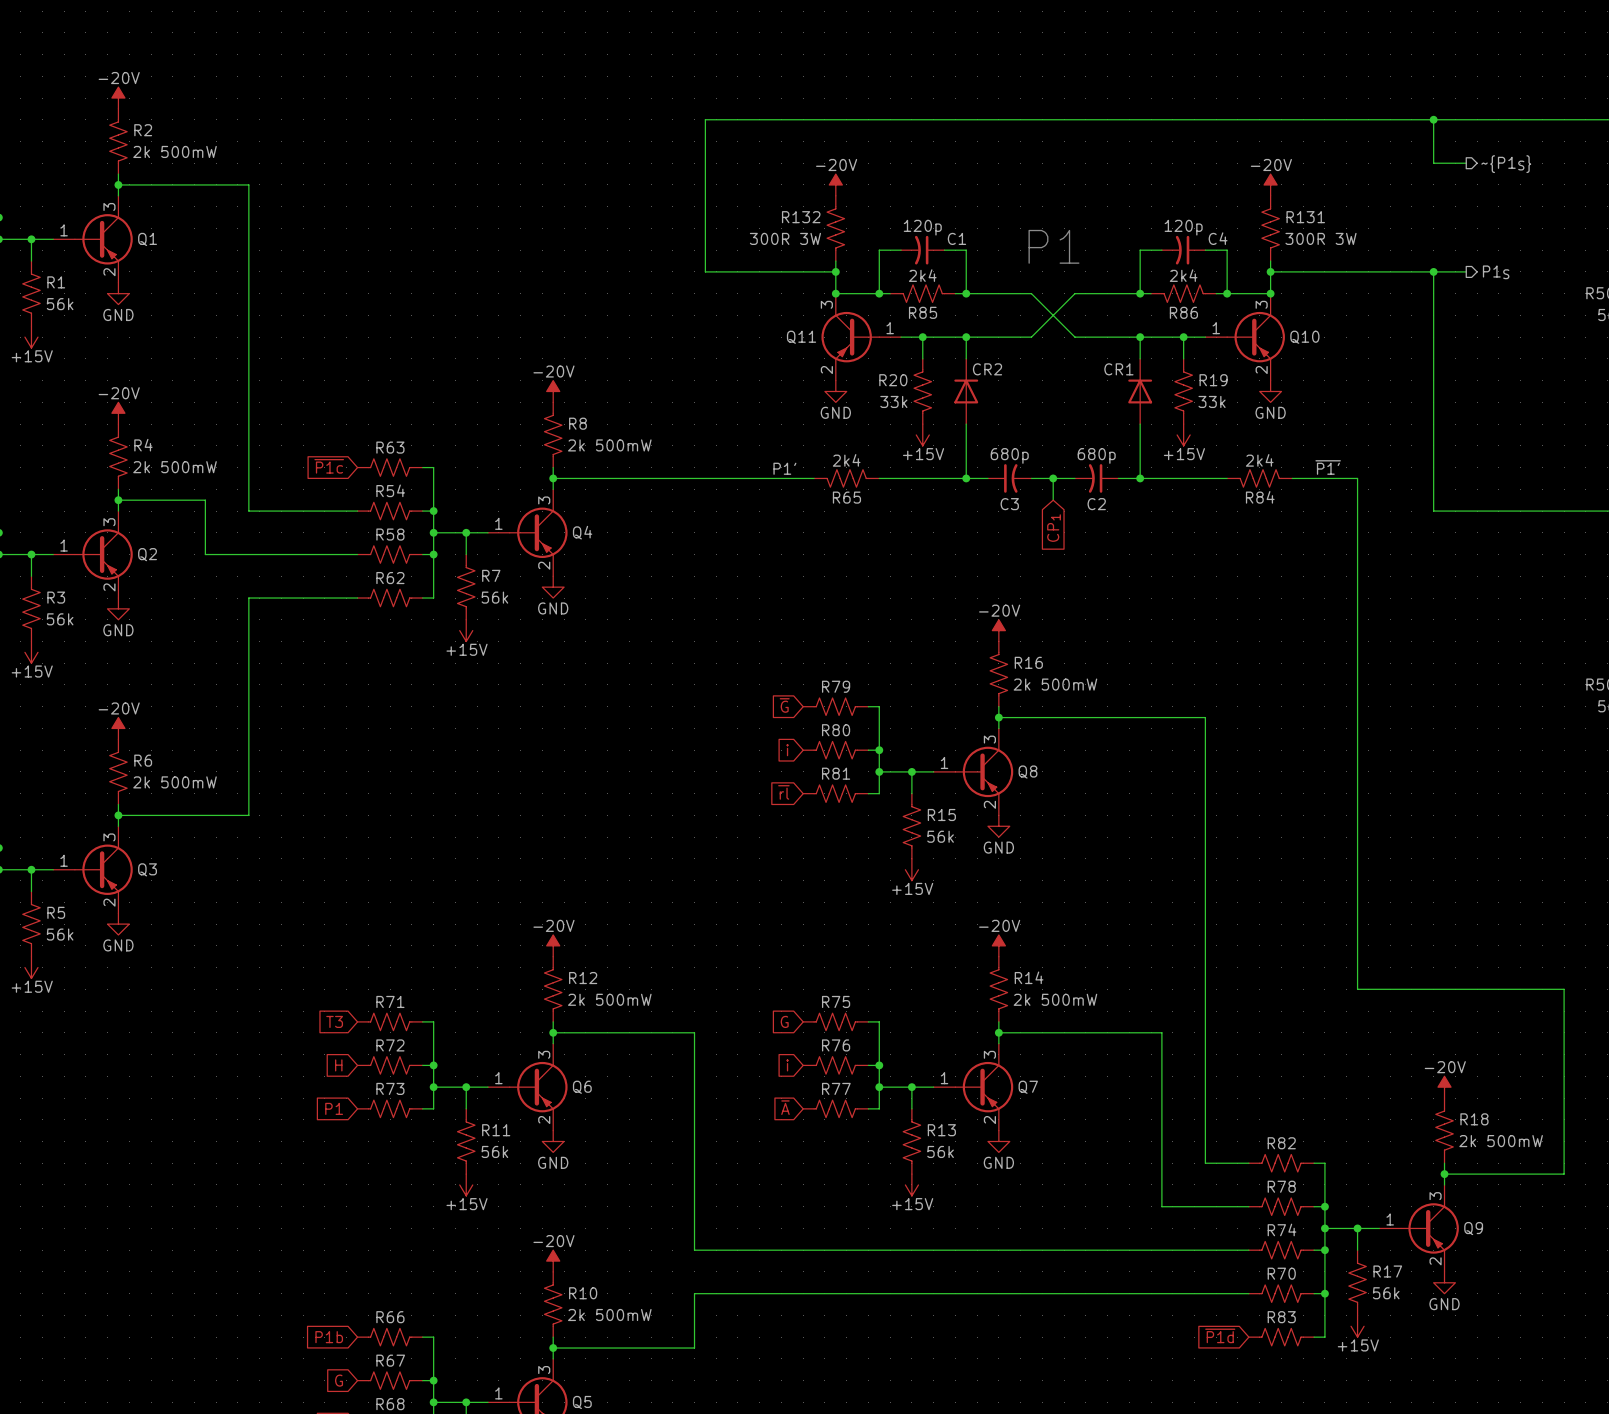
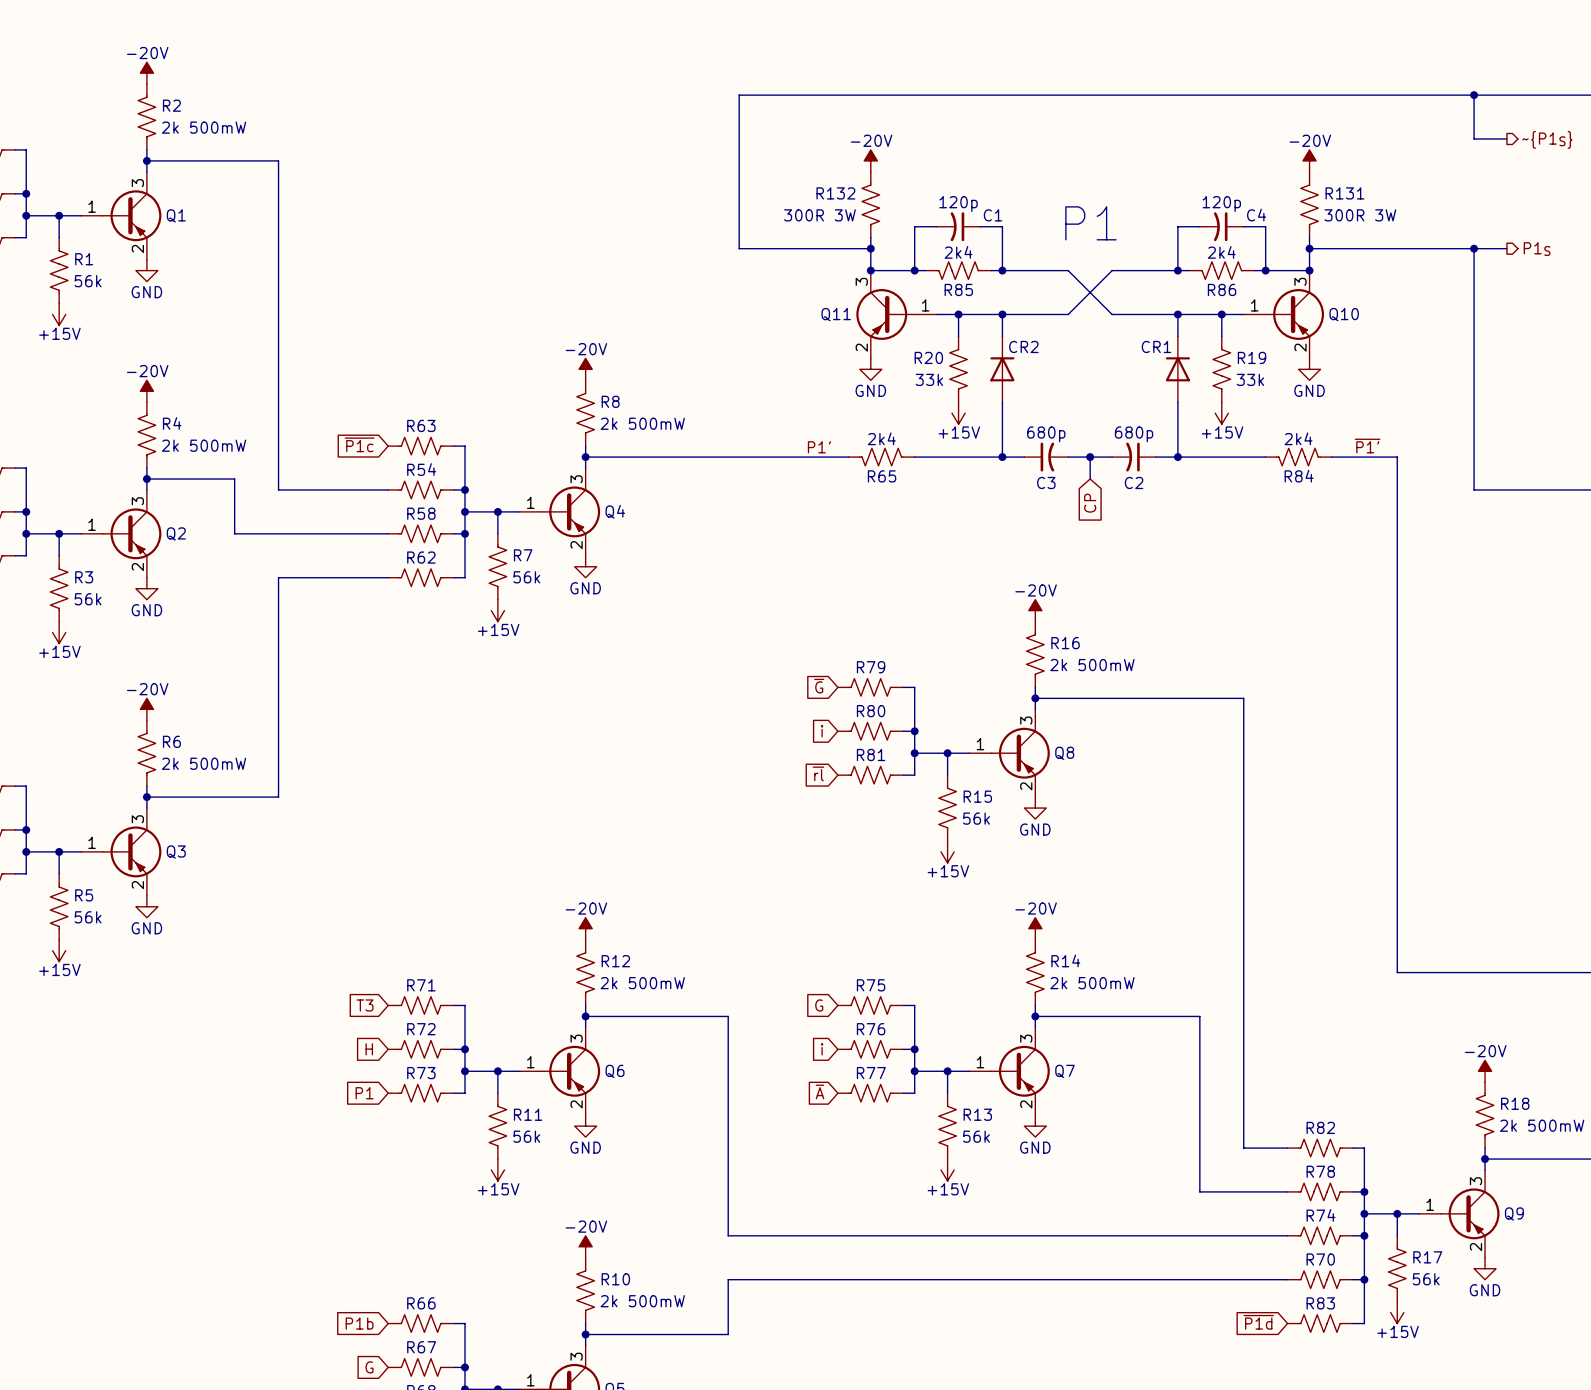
global label: CP1 (1054, 528) -> CP (1090, 503)

